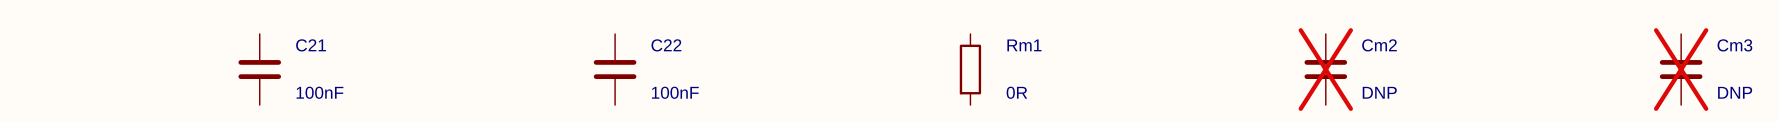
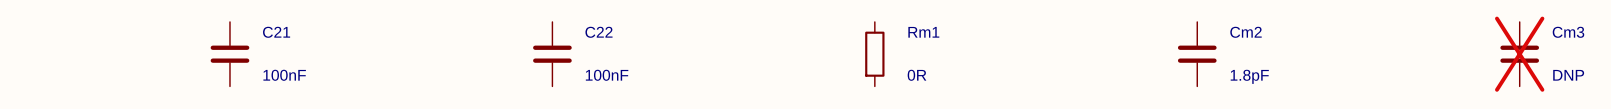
Cm2 do-not-place cross: (1325, 69) -> none
Cm2 value: DNP (1379, 92) -> 1.8pF (1249, 76)

